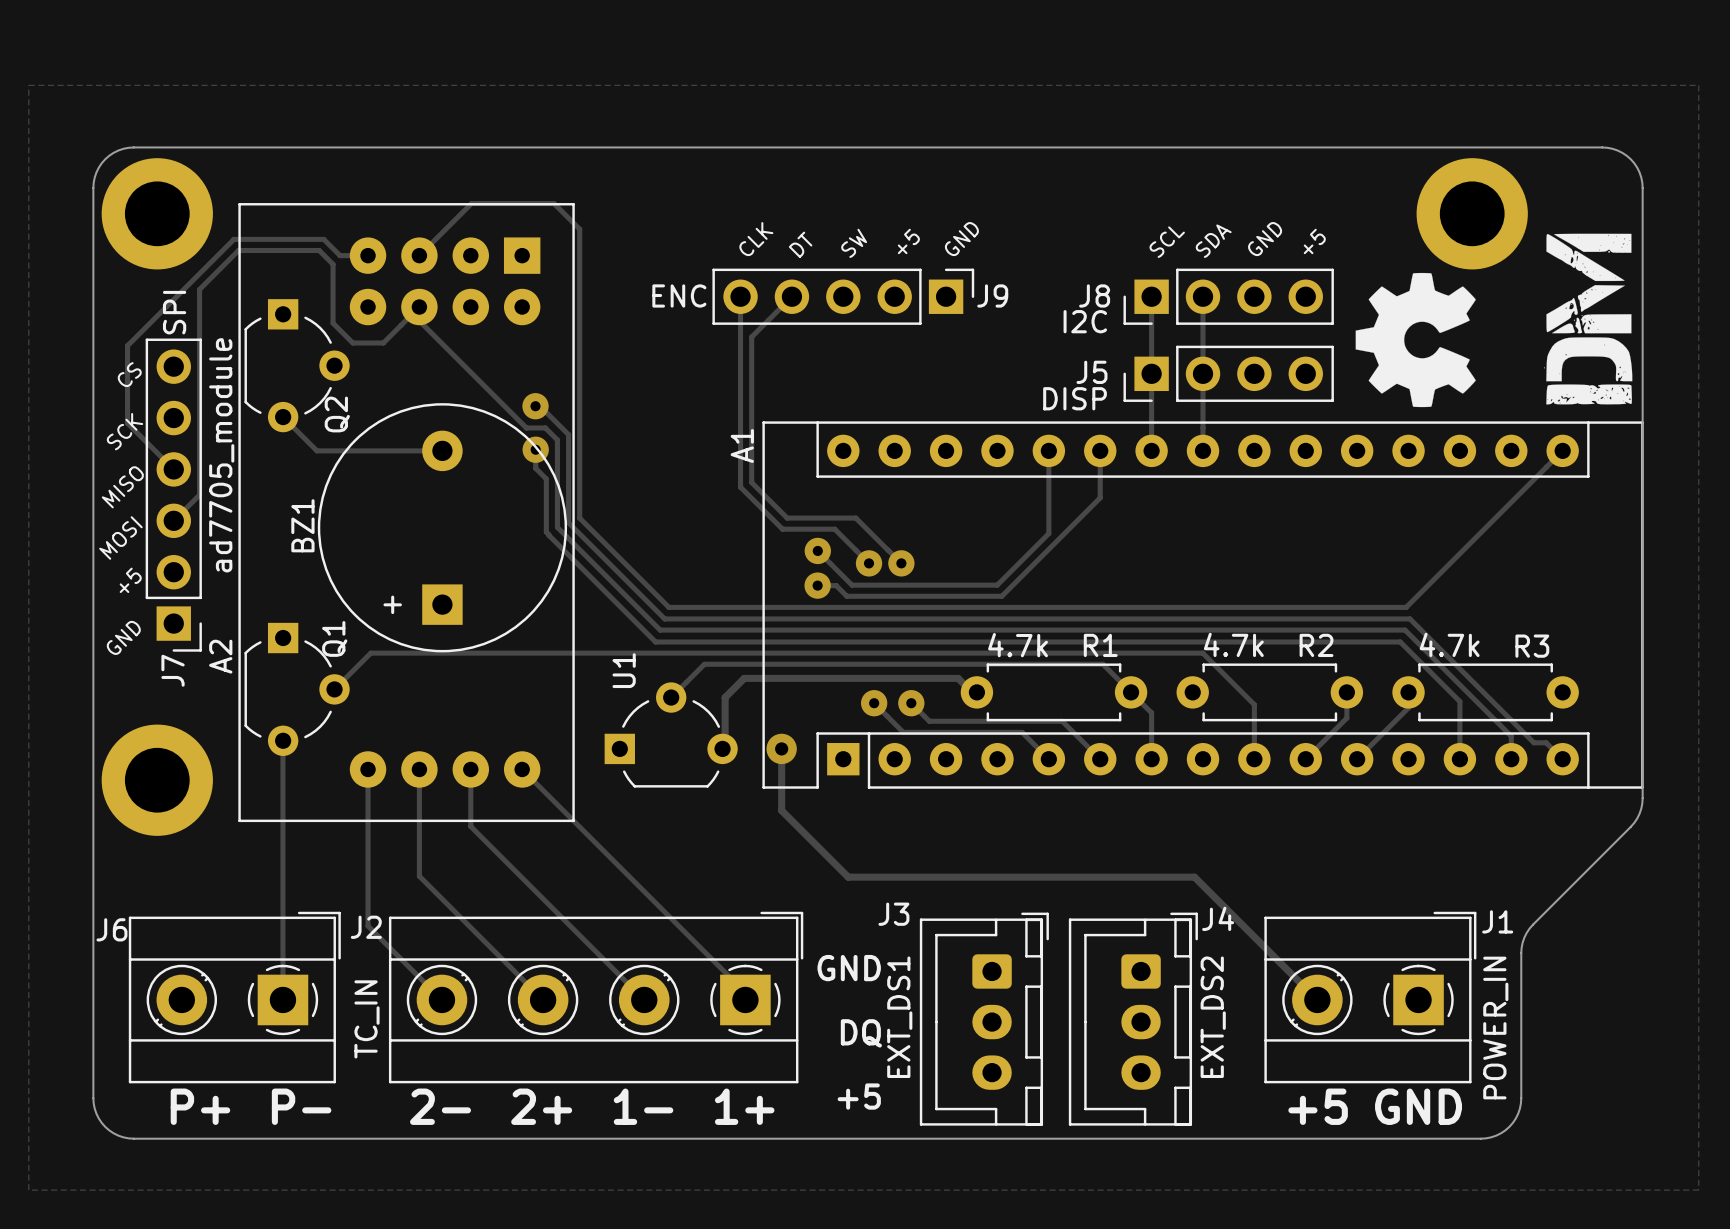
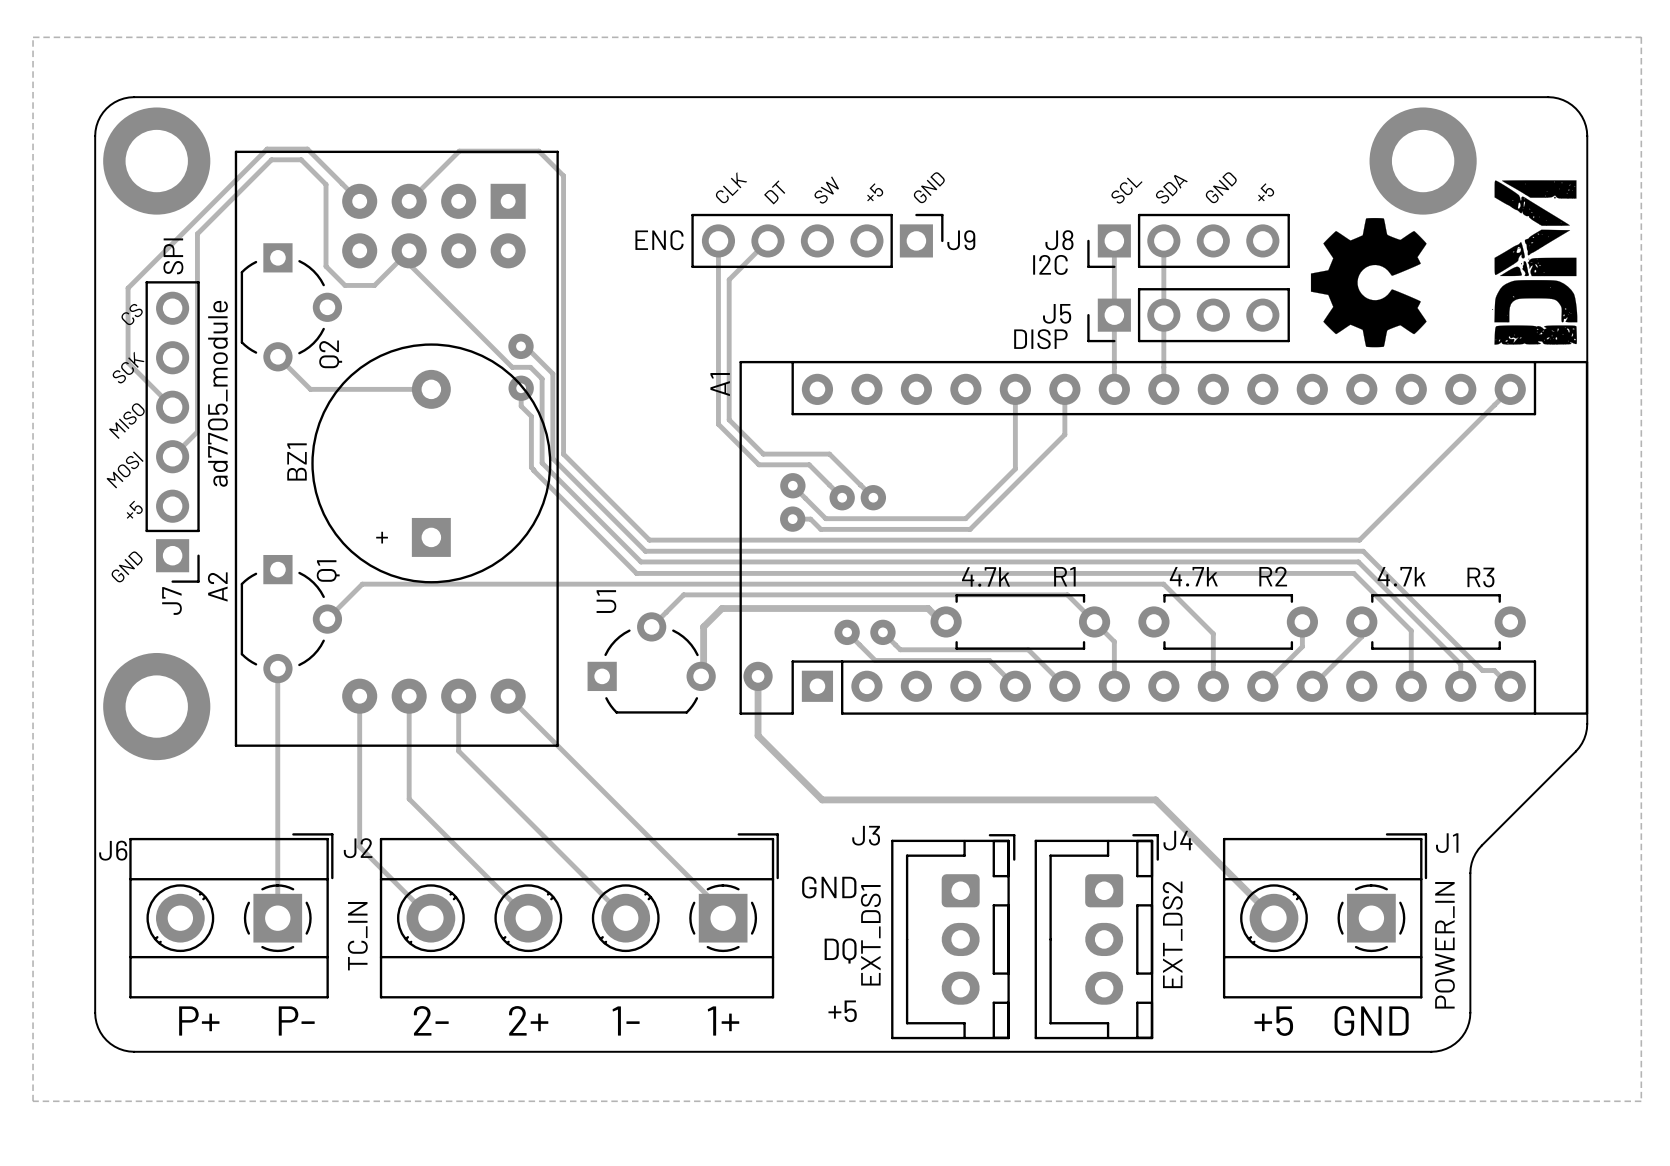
track: (233, 239) (323, 239) (340, 255) (368, 255) -> (230, 185) (267, 149) (307, 149) (359, 201)
track: (238, 250) (319, 250) (333, 264) -> (235, 196) (271, 159) (301, 159) (326, 184) (326, 209)

